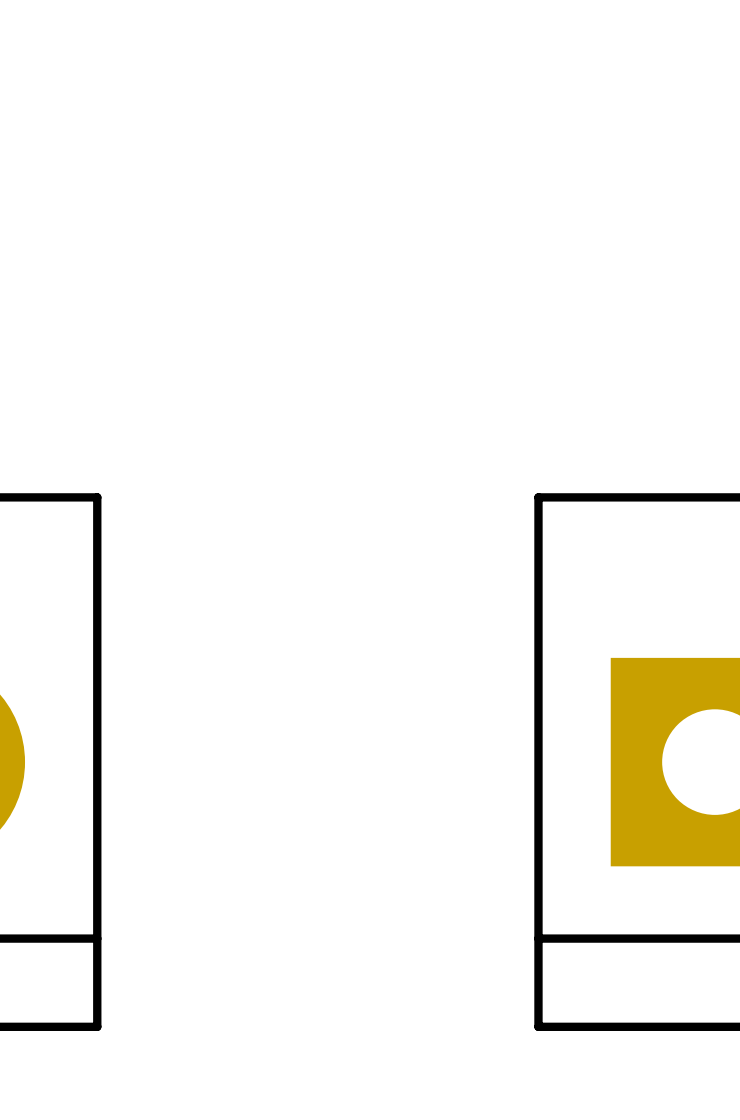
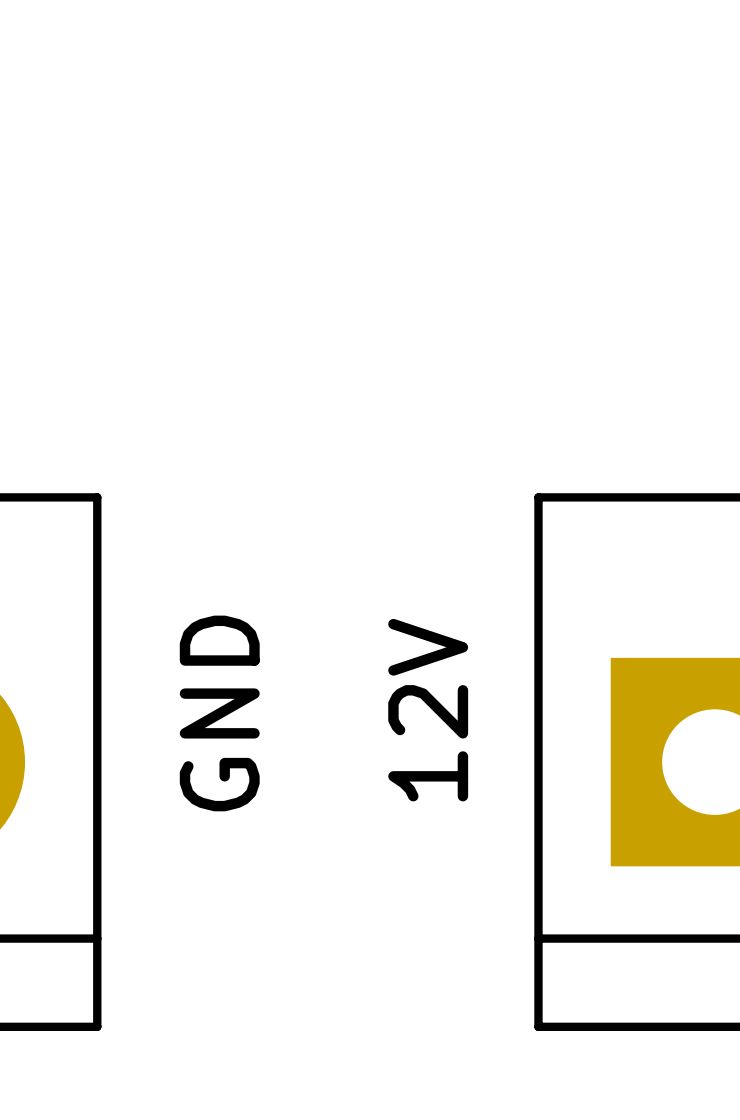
text: none -> 12V (428, 710)
text: none -> GND (219, 713)

